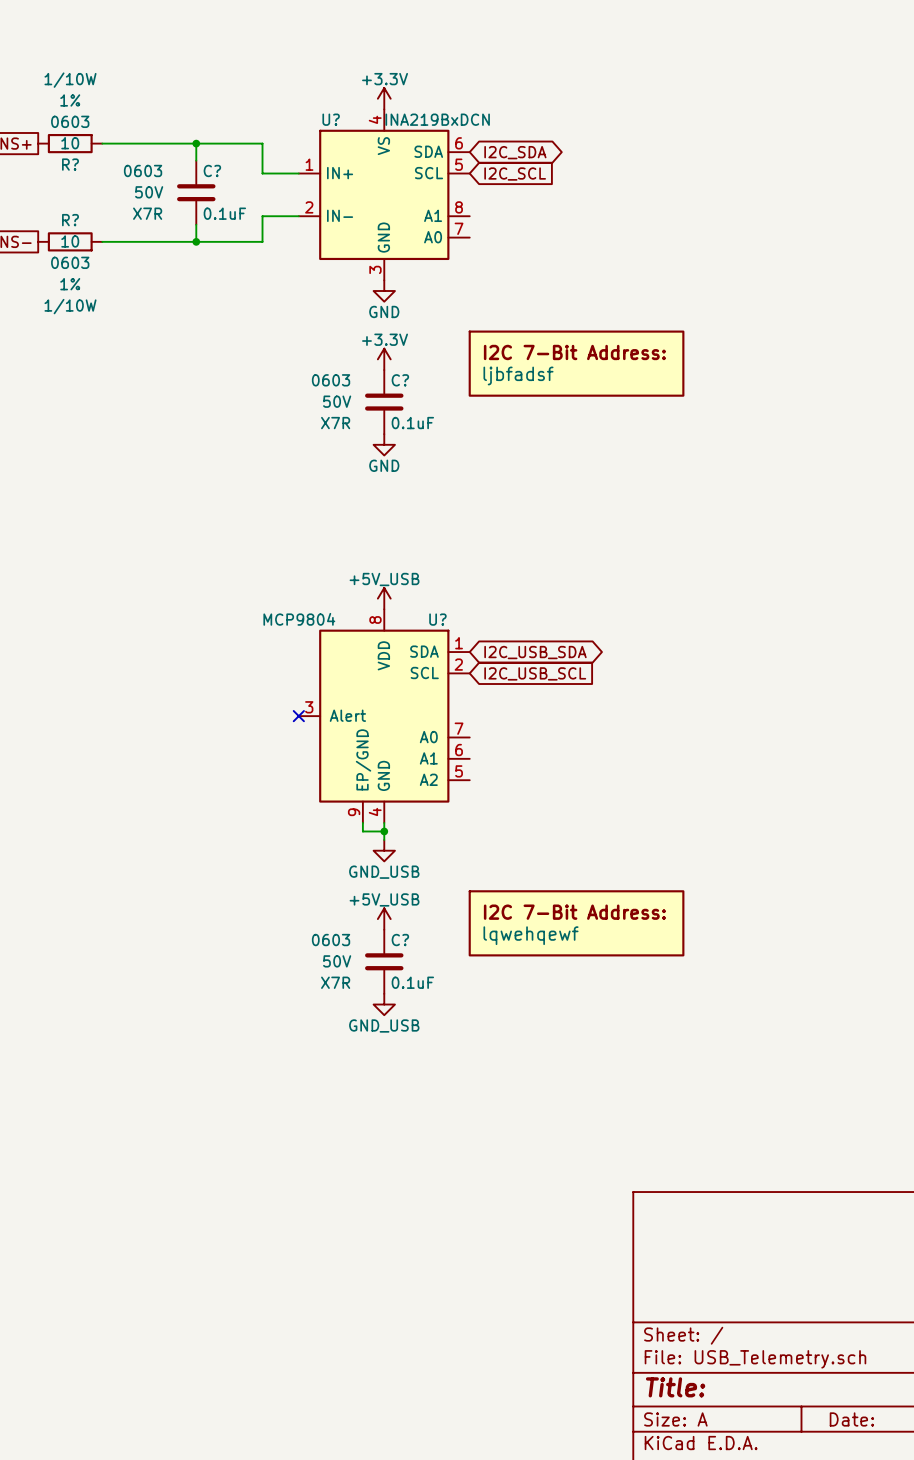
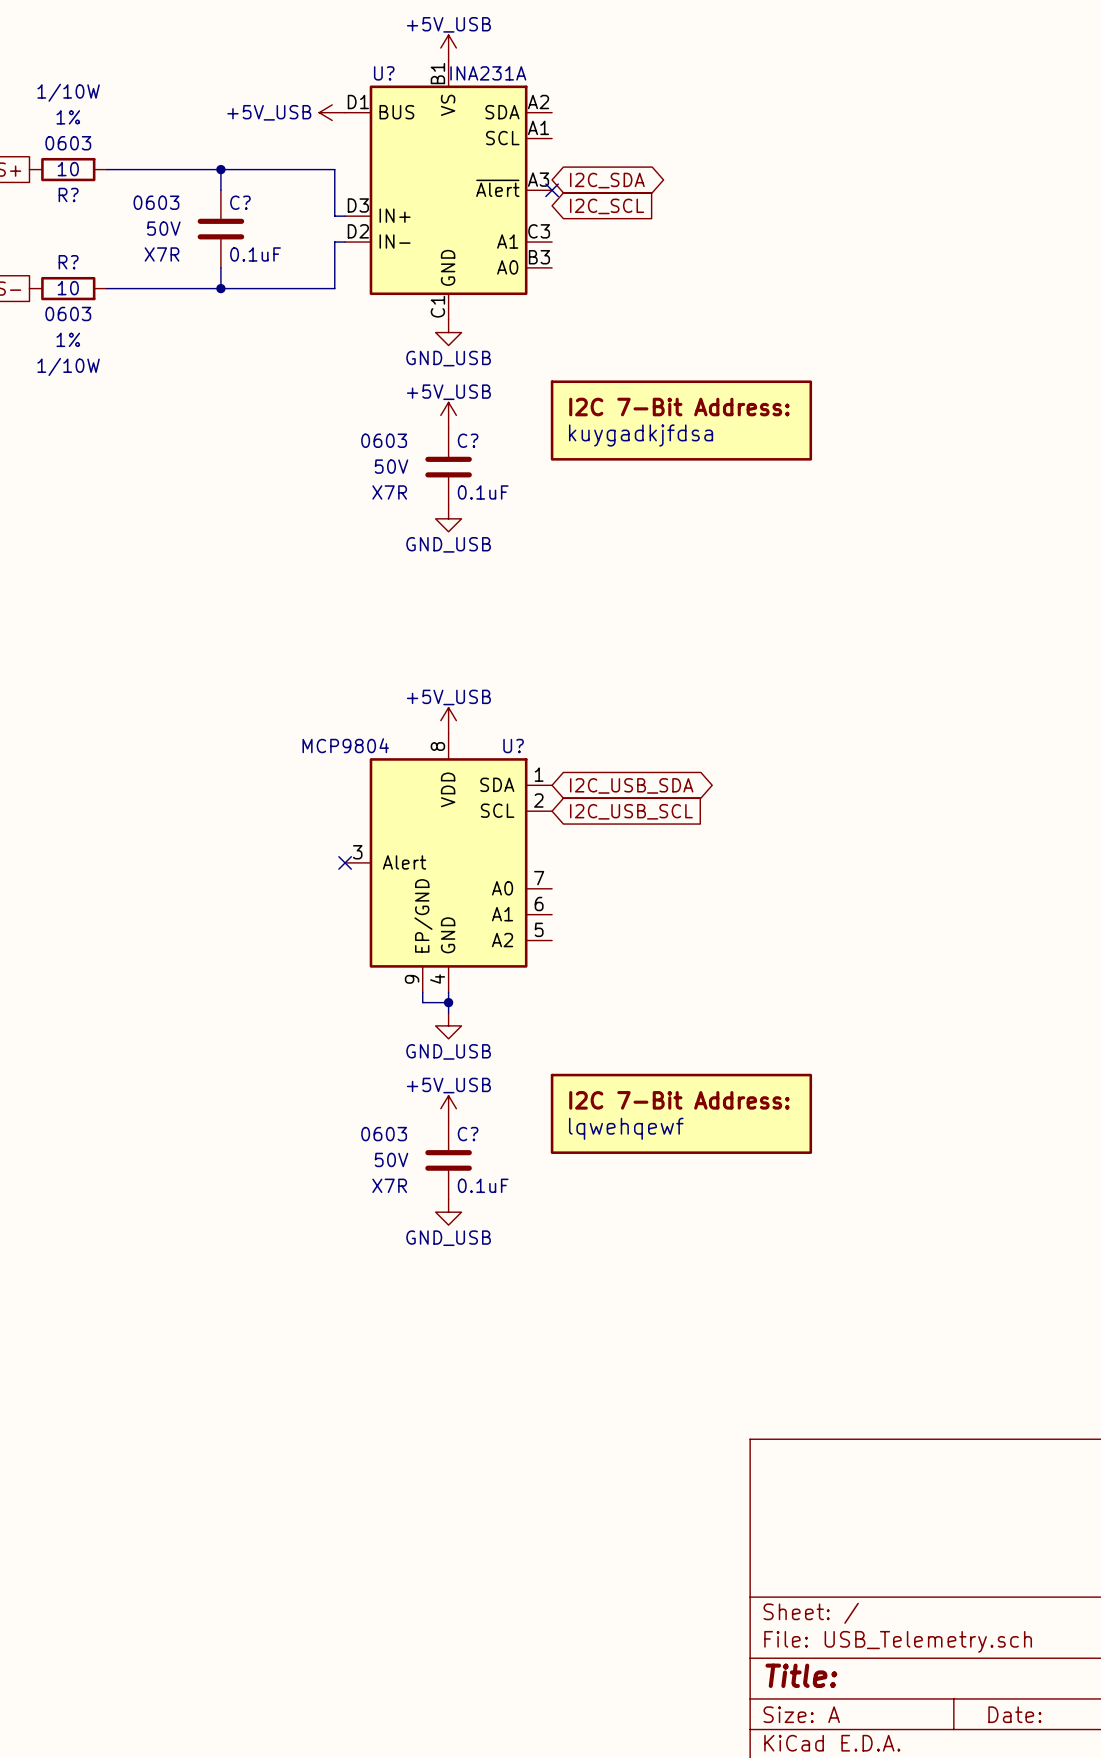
power symbol: none -> +5V_USB (448, 48)
power symbol: none -> +5V_USB (332, 112)
power symbol: +3.3V (384, 98) -> none
wire: (262, 143) (262, 173) (298, 173) -> (301, 169) (334, 169) (334, 216) (345, 216)
U?: none -> INA231A (448, 190)
no-connect mark: none -> (552, 190)
U?: INA219BxDCN (384, 194) -> none
wire: (298, 216) (262, 216) (262, 241) -> (345, 242) (334, 242) (334, 288) (301, 288)
power symbol: none -> GND_USB (448, 332)
power symbol: GND (384, 291) -> none
power symbol: none -> +5V_USB (448, 415)
part: none -> kuygadkjfdsa (681, 420)
power symbol: +3.3V (384, 359) -> none
part: ljbfadsf (576, 363) -> none
C? position: (384, 402) -> (448, 467)
power symbol: none -> GND_USB (448, 518)
power symbol: GND (384, 444) -> none

